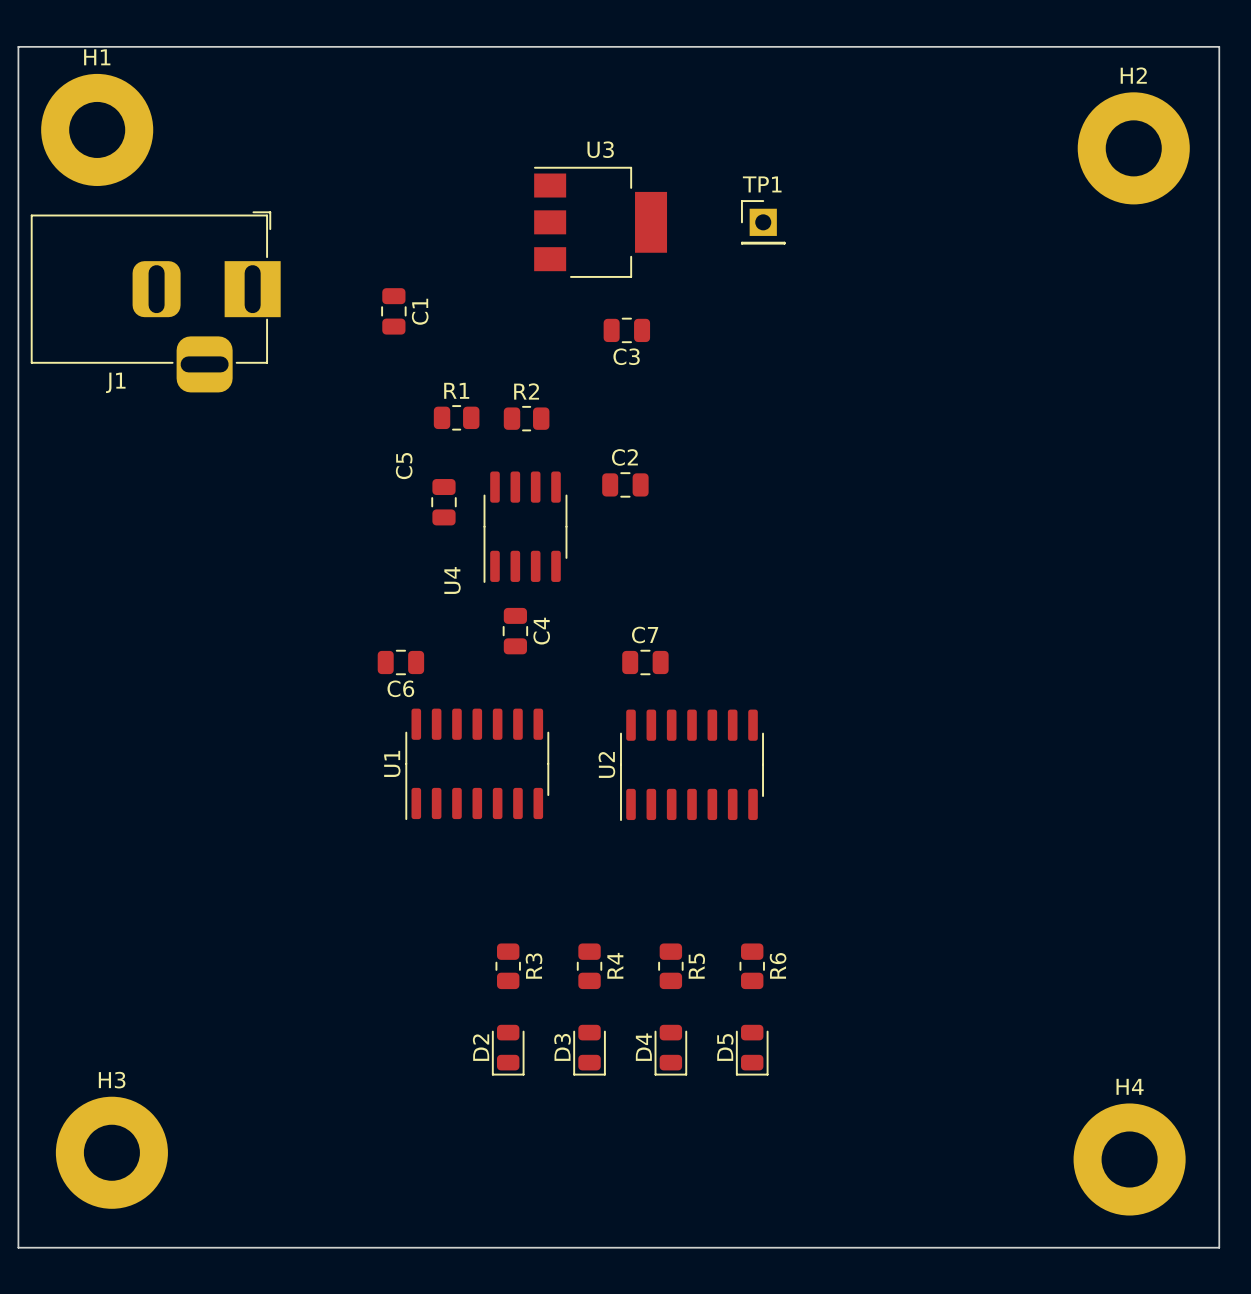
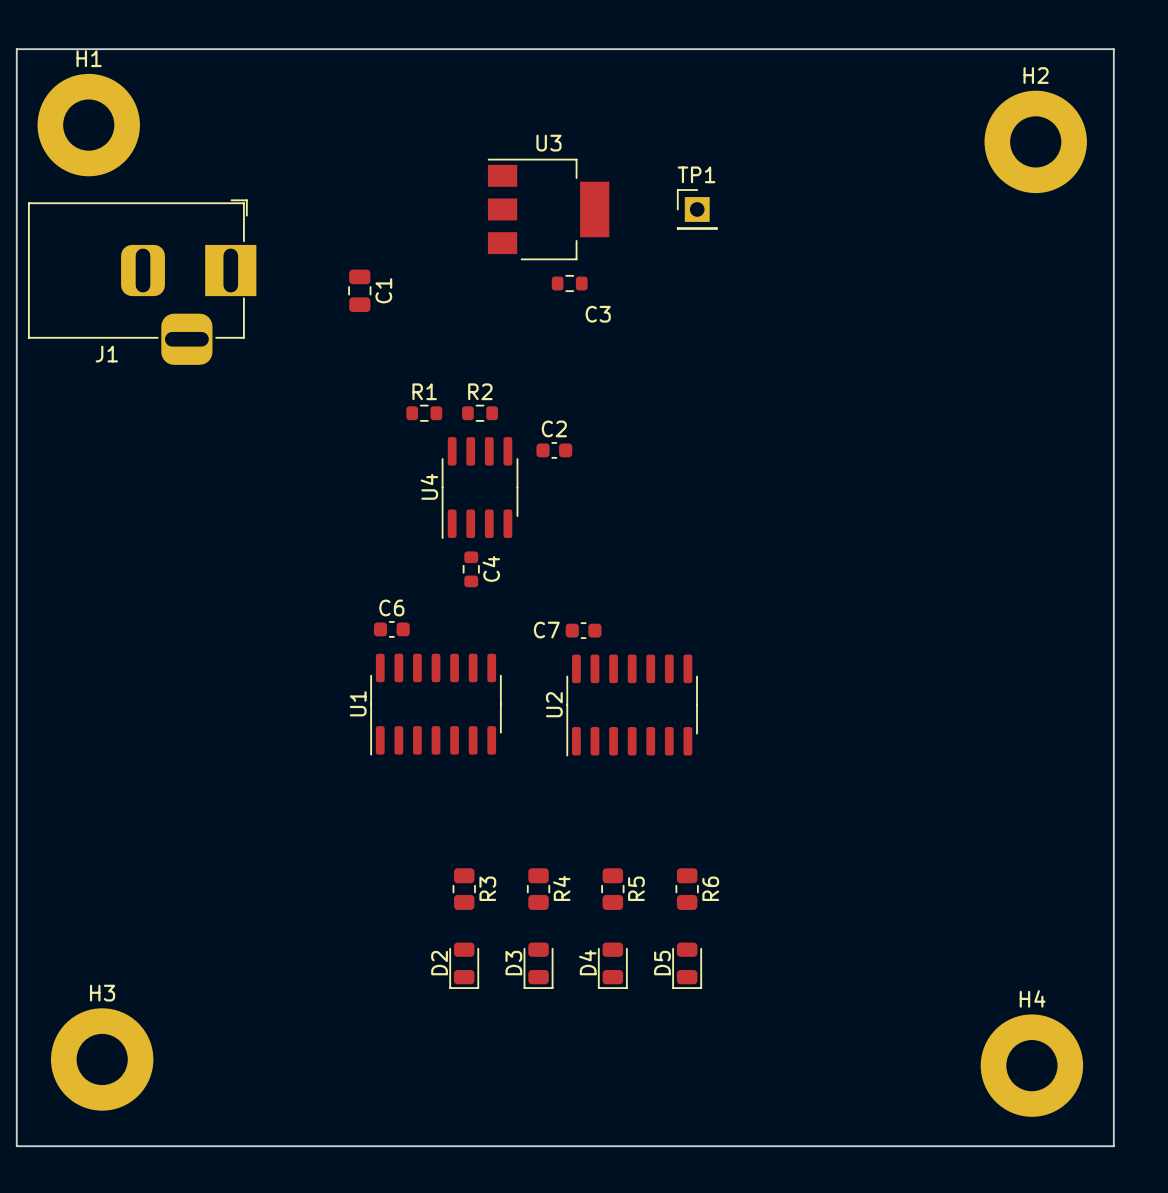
C3 footprint: [603, 317, 651, 344] -> [551, 274, 588, 293]
C3 name position: C3 (626, 356) -> C3 (598, 314)
R1 footprint: [433, 405, 480, 431] -> [406, 404, 443, 422]
R2 footprint: [503, 405, 550, 432] -> [462, 404, 498, 422]
C2 footprint: [602, 472, 649, 498] -> [536, 442, 573, 459]
C5: (443, 502) -> none
U4 name position: U4 (452, 580) -> U4 (429, 486)
C4 footprint: [502, 607, 529, 655] -> [462, 551, 480, 588]
C7 name position: C7 (645, 635) -> C7 (546, 630)
C6 footprint: [377, 649, 425, 676] -> [373, 621, 410, 638]
C7 footprint: [622, 649, 669, 676] -> [565, 622, 602, 639]
C6 name position: C6 (400, 688) -> C6 (391, 607)

